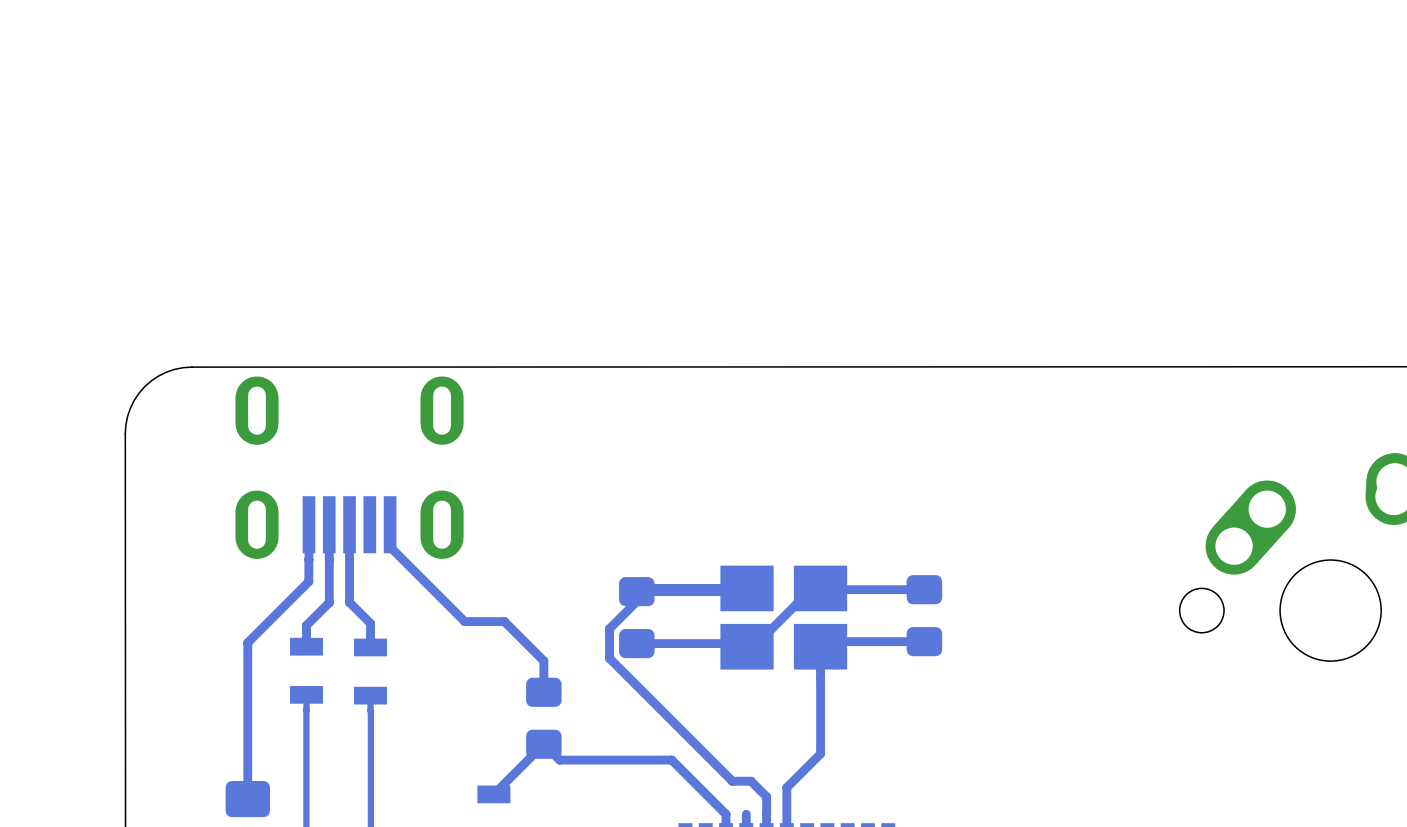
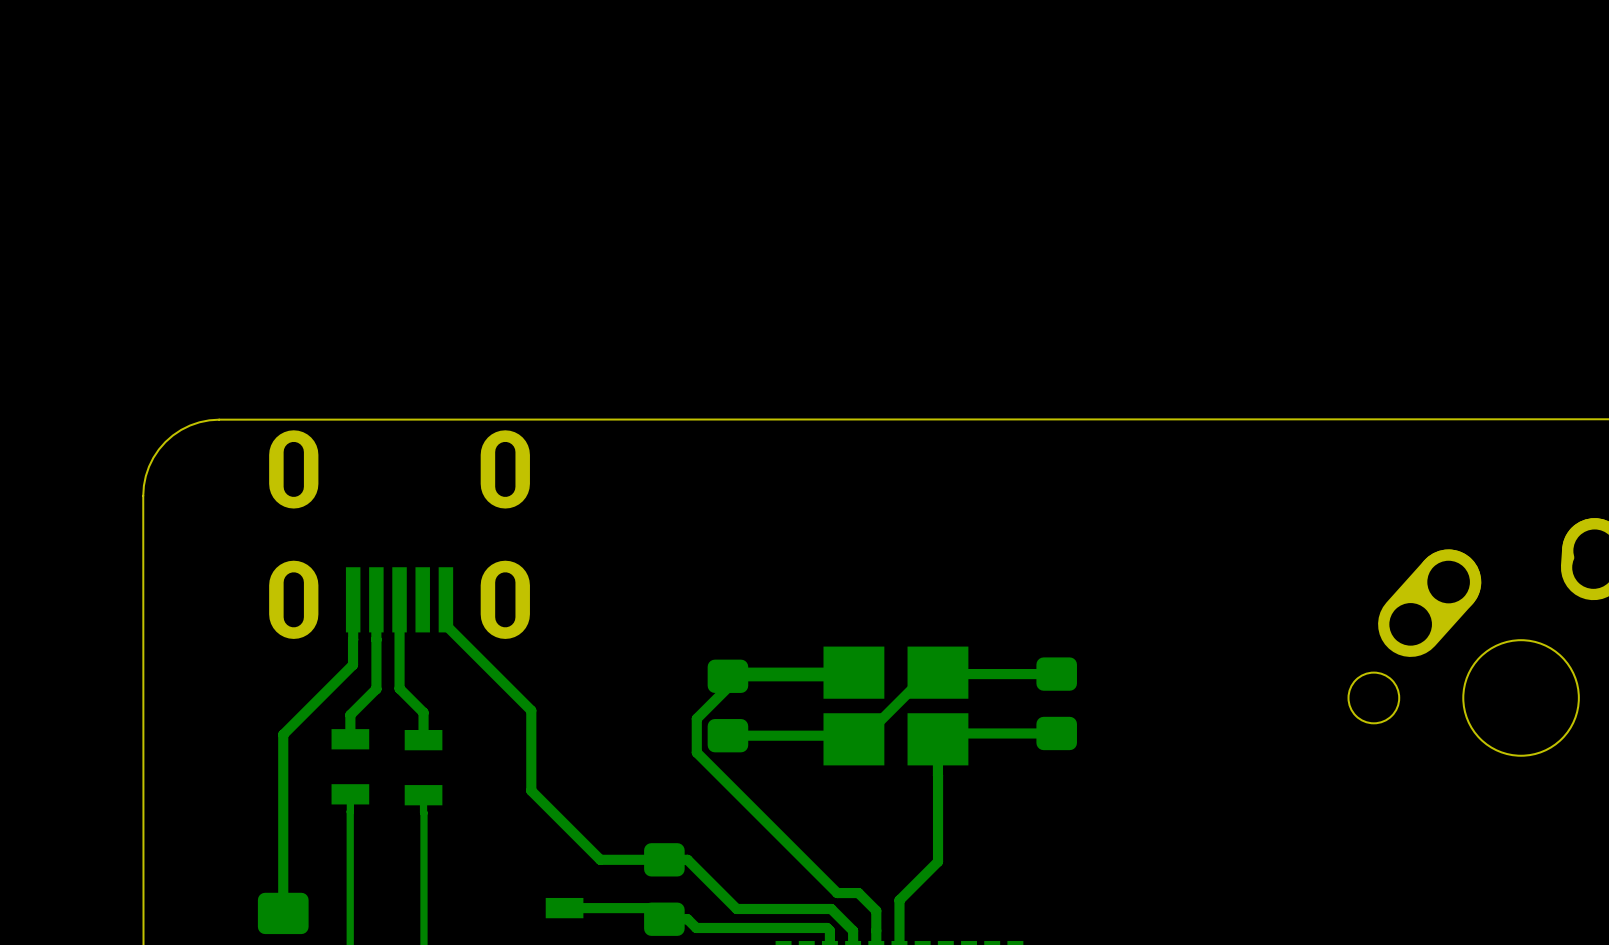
bottom track: (464, 621) (504, 621) (543, 660) (543, 692) -> (531, 710) (531, 790) (600, 859) (687, 859) (736, 908) (831, 908) (853, 930)
part position: (543, 718) -> (664, 889)
bottom track: (493, 794) (543, 744) (559, 760) (671, 760) (723, 811) -> (564, 908) (653, 908) (664, 919) (687, 919) (696, 927) (827, 927)

